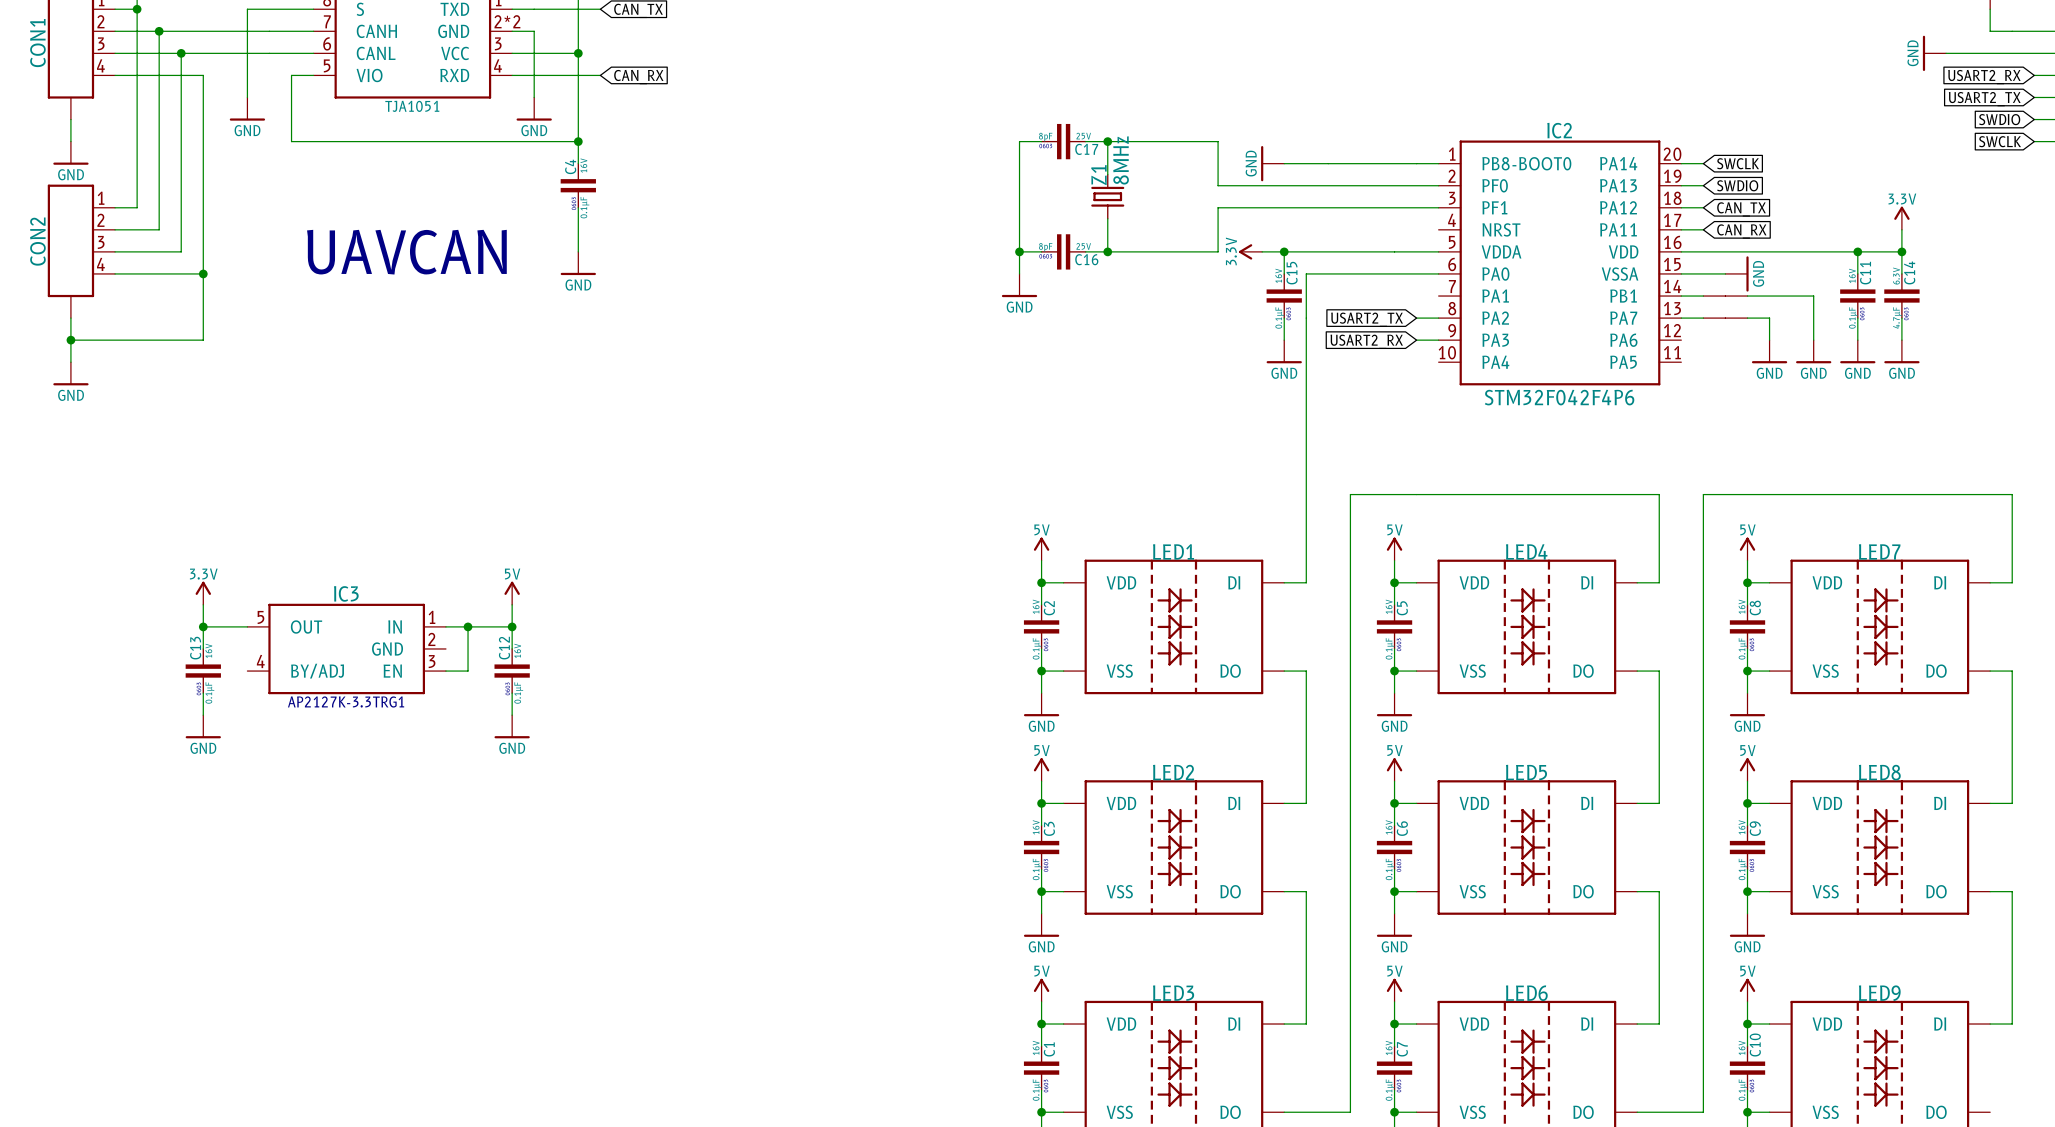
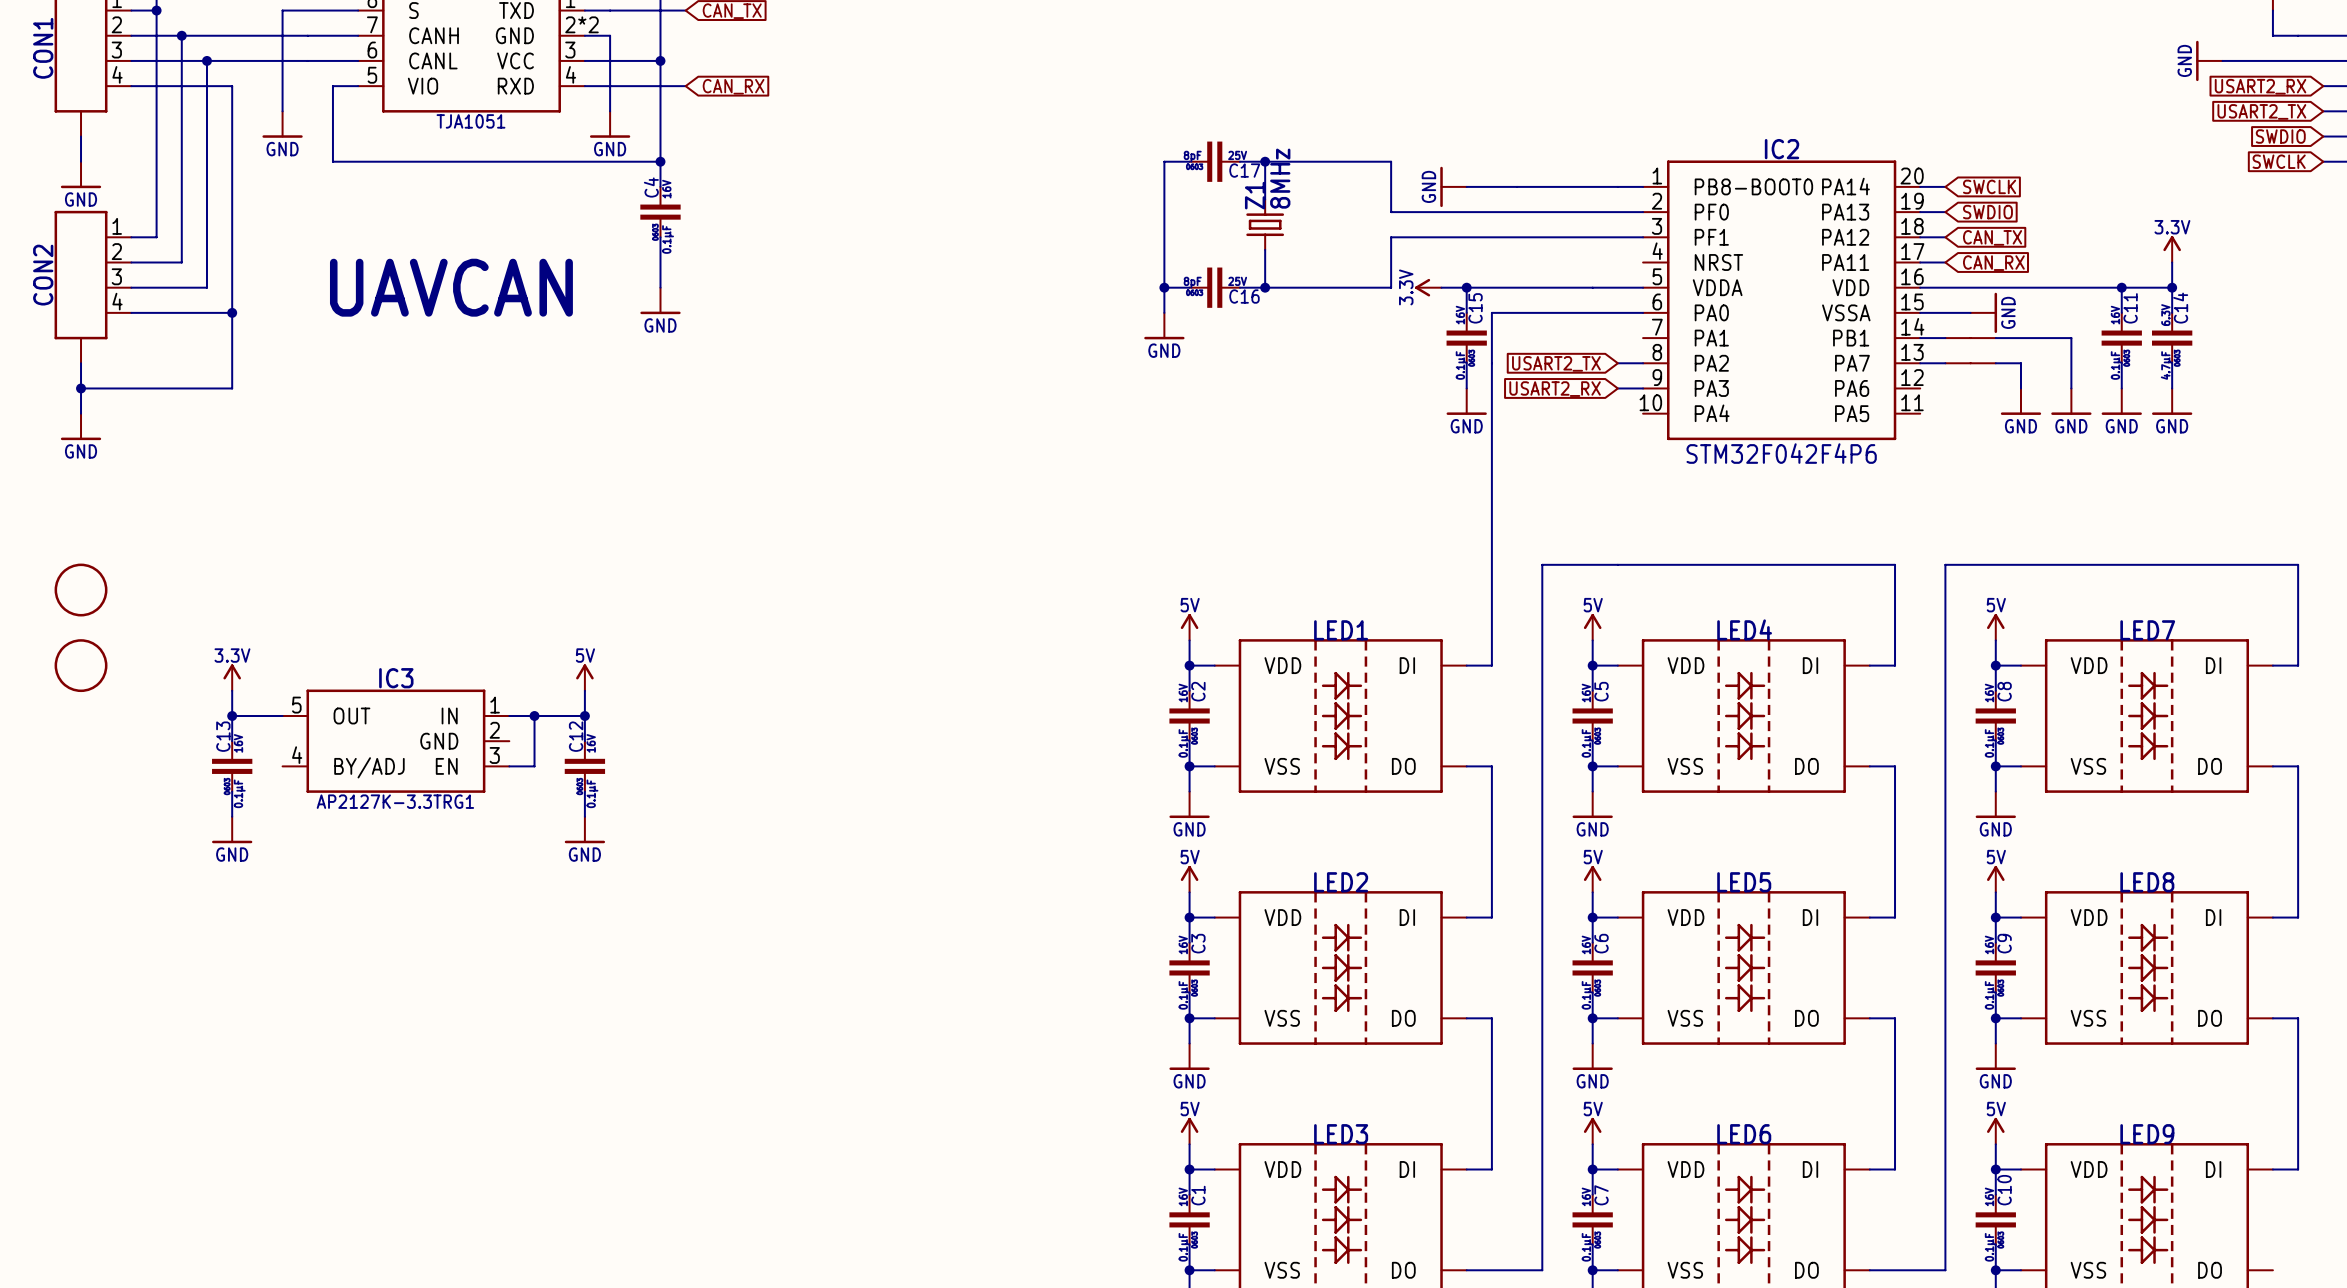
part: none -> (81, 590)
part: none -> (81, 665)

